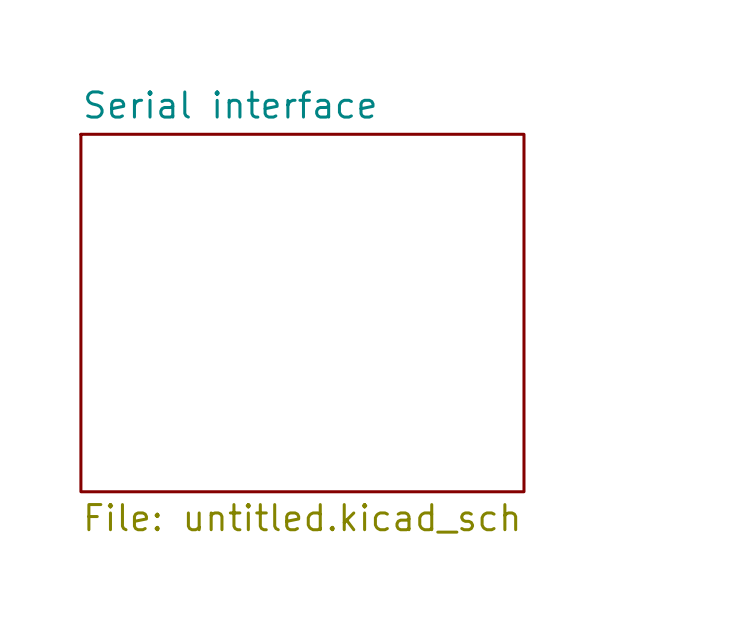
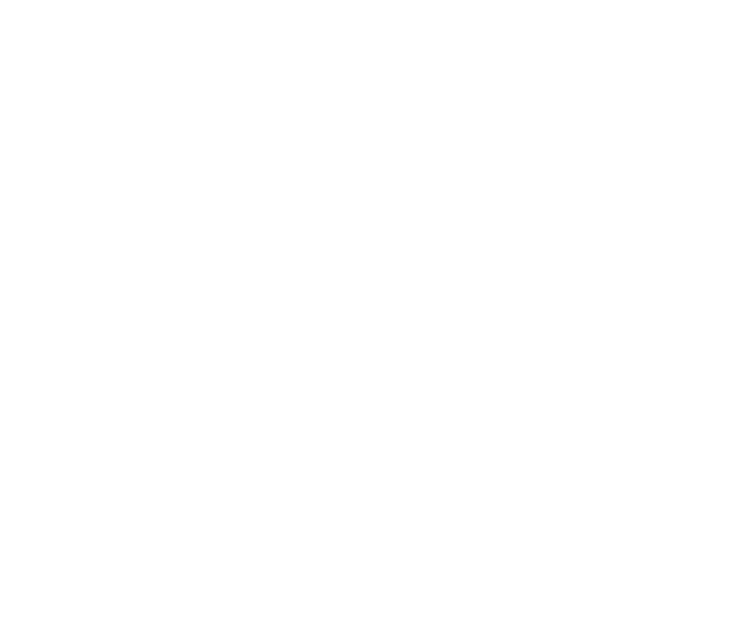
sheet Serial interface: File: untitled.kicad_sch (302, 313) -> none

